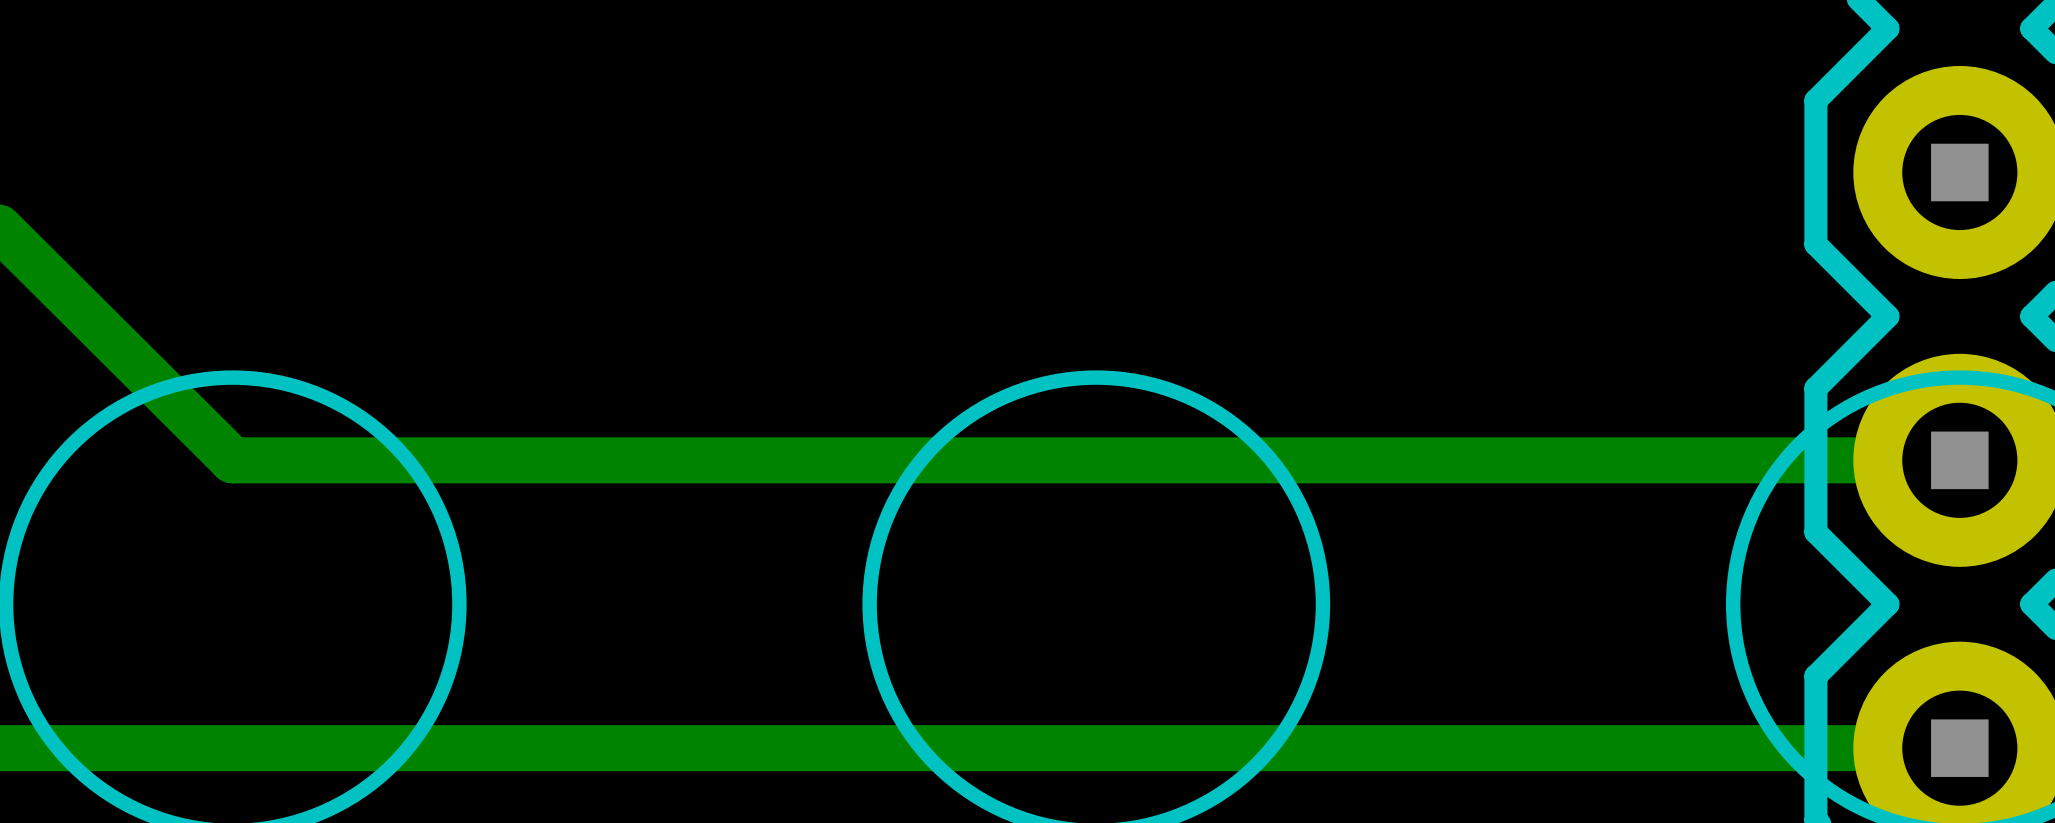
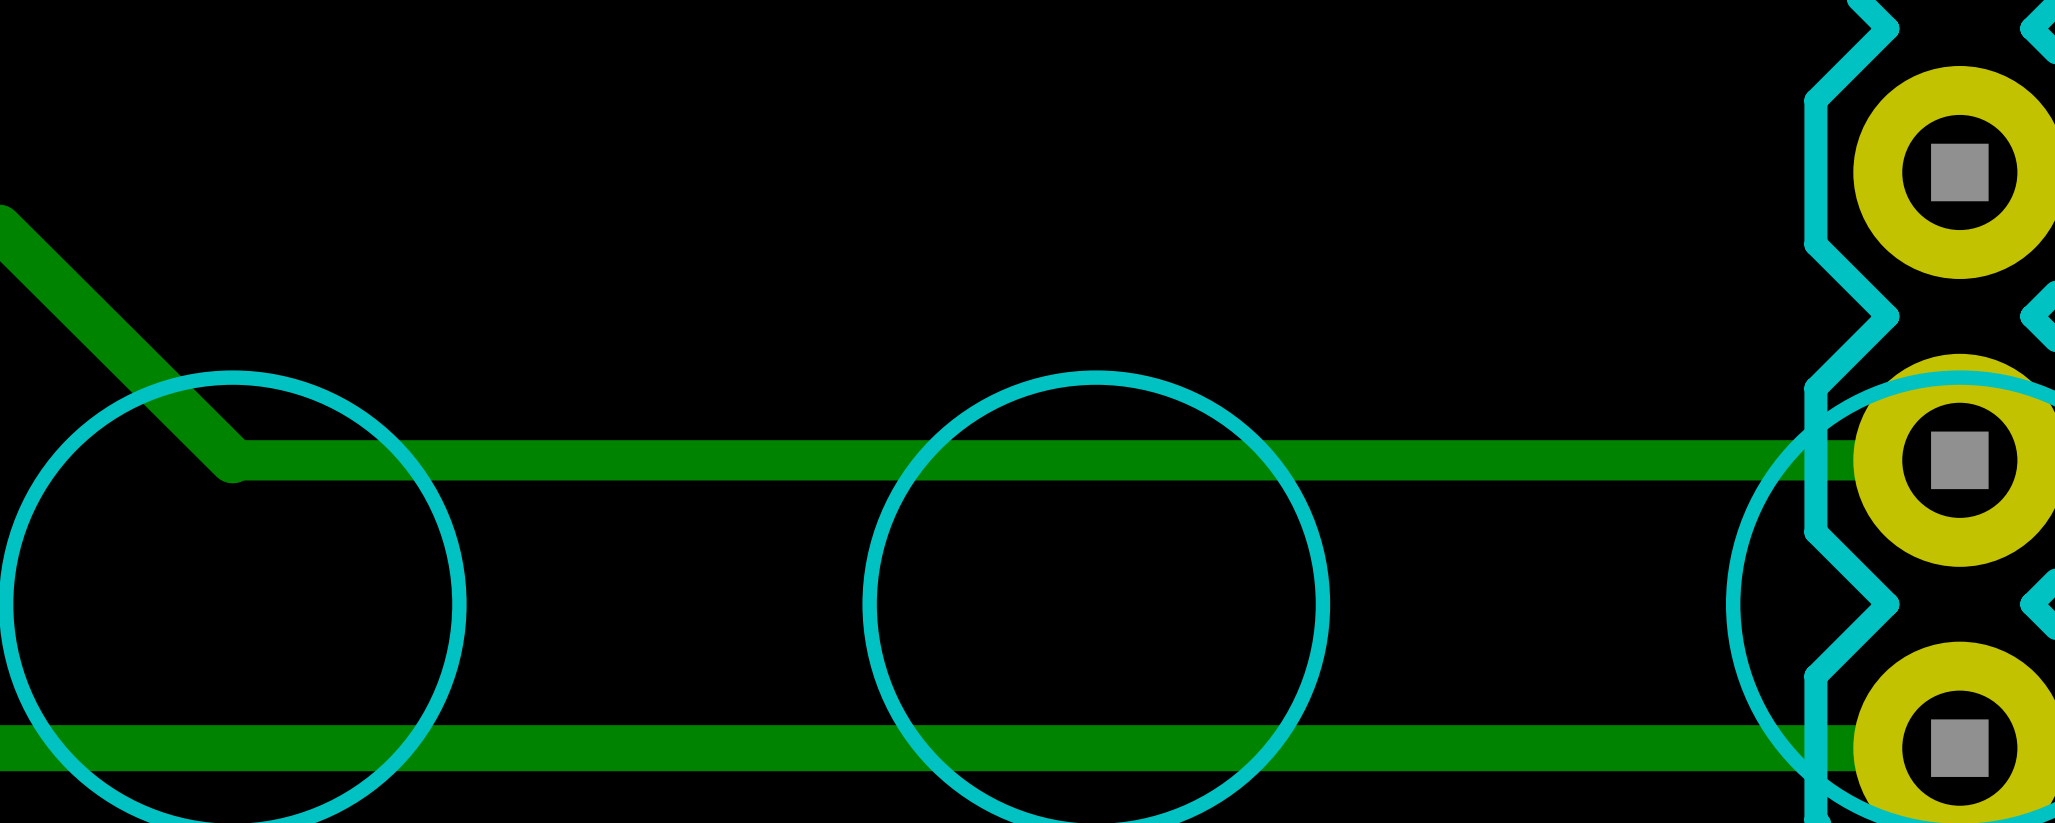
bottom track width: thick (232, 460) (1959, 460) -> thin (232, 460) (1959, 460)

